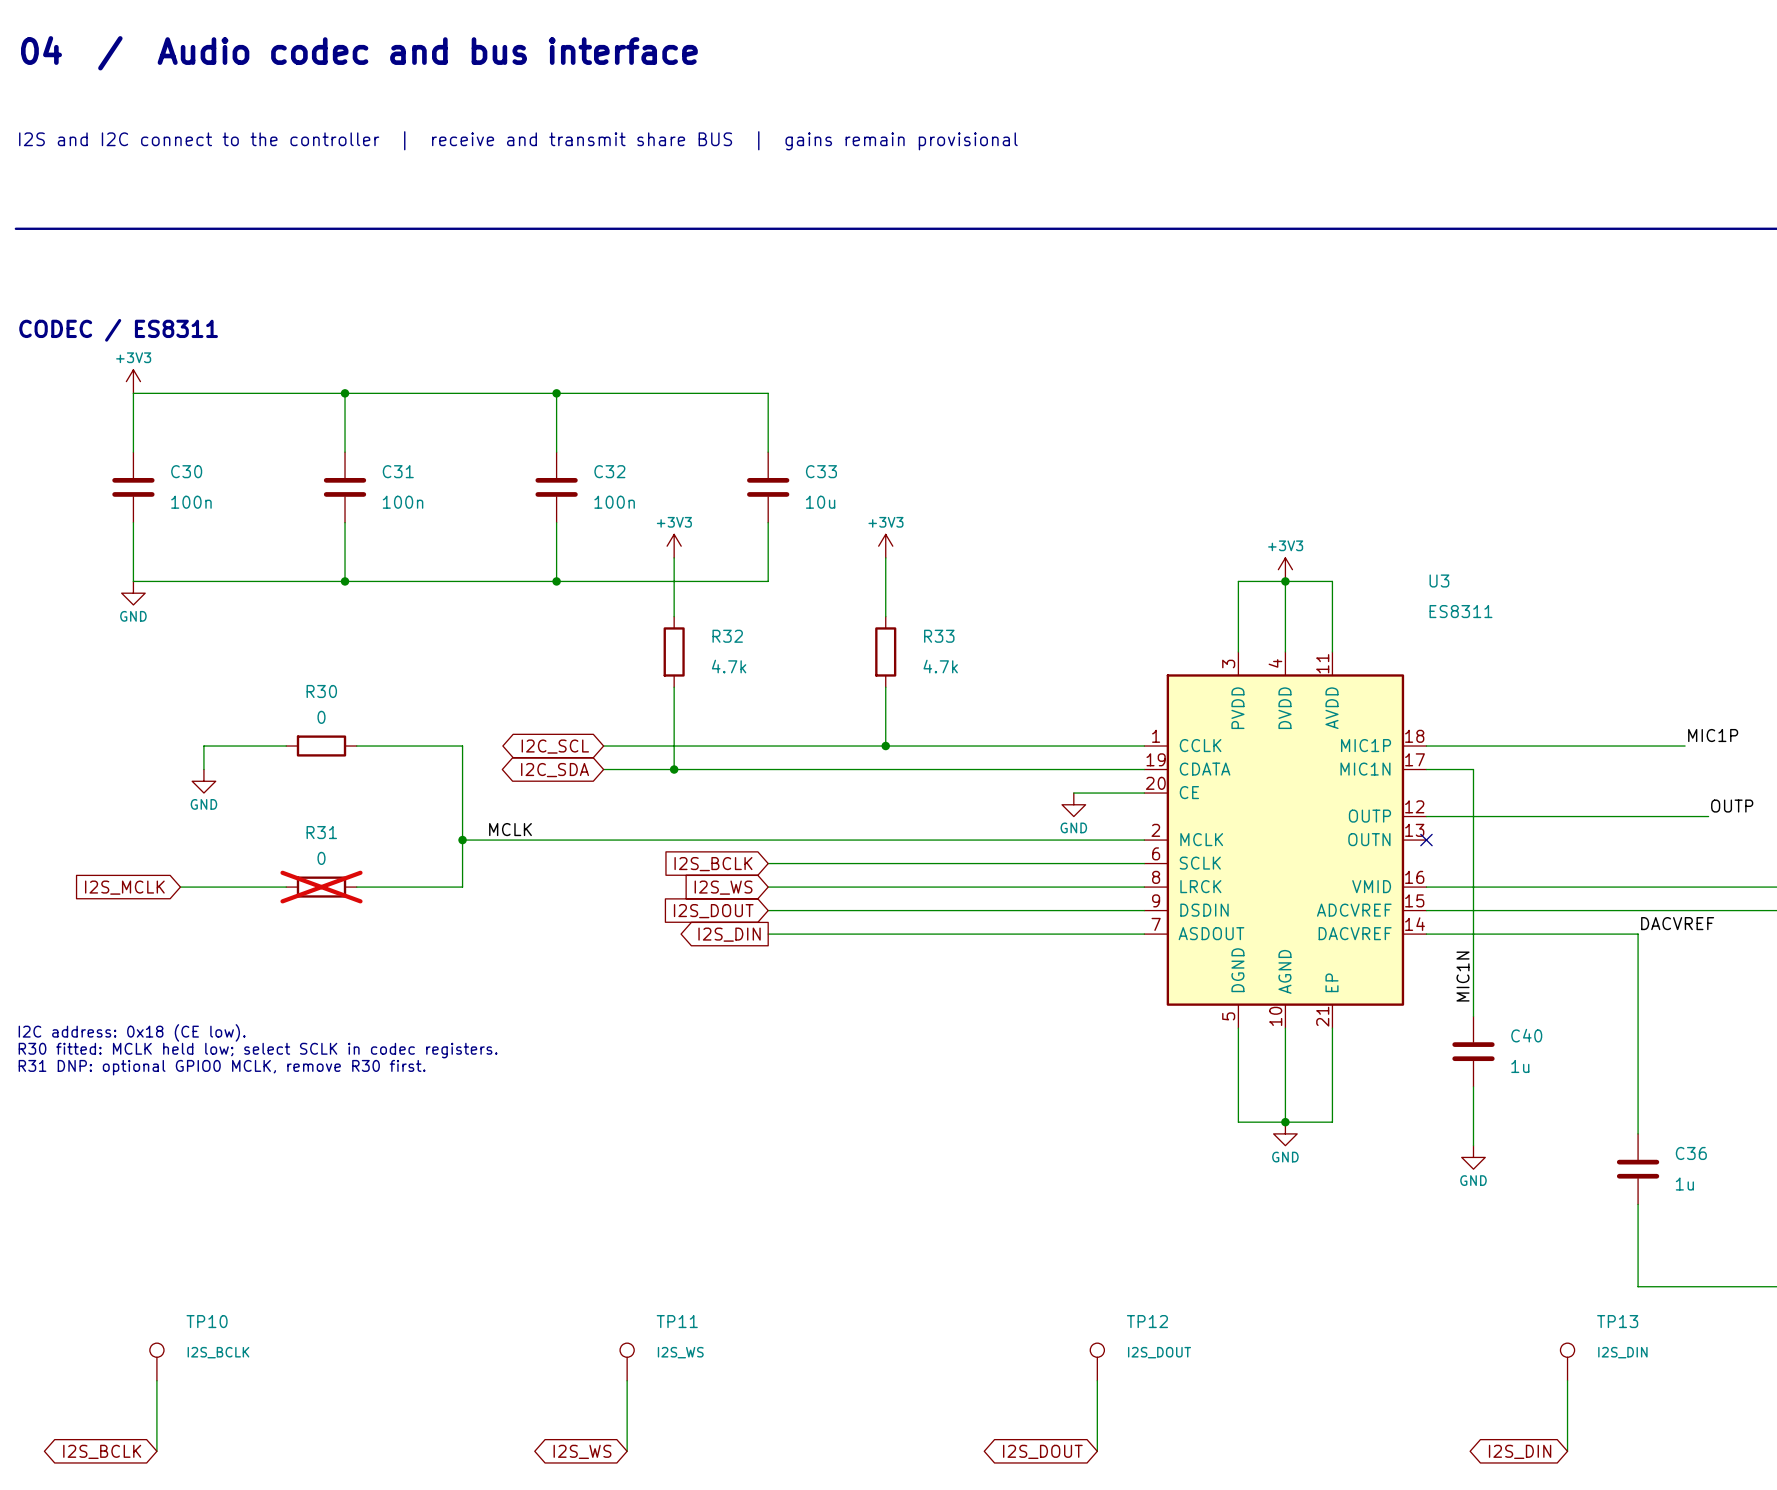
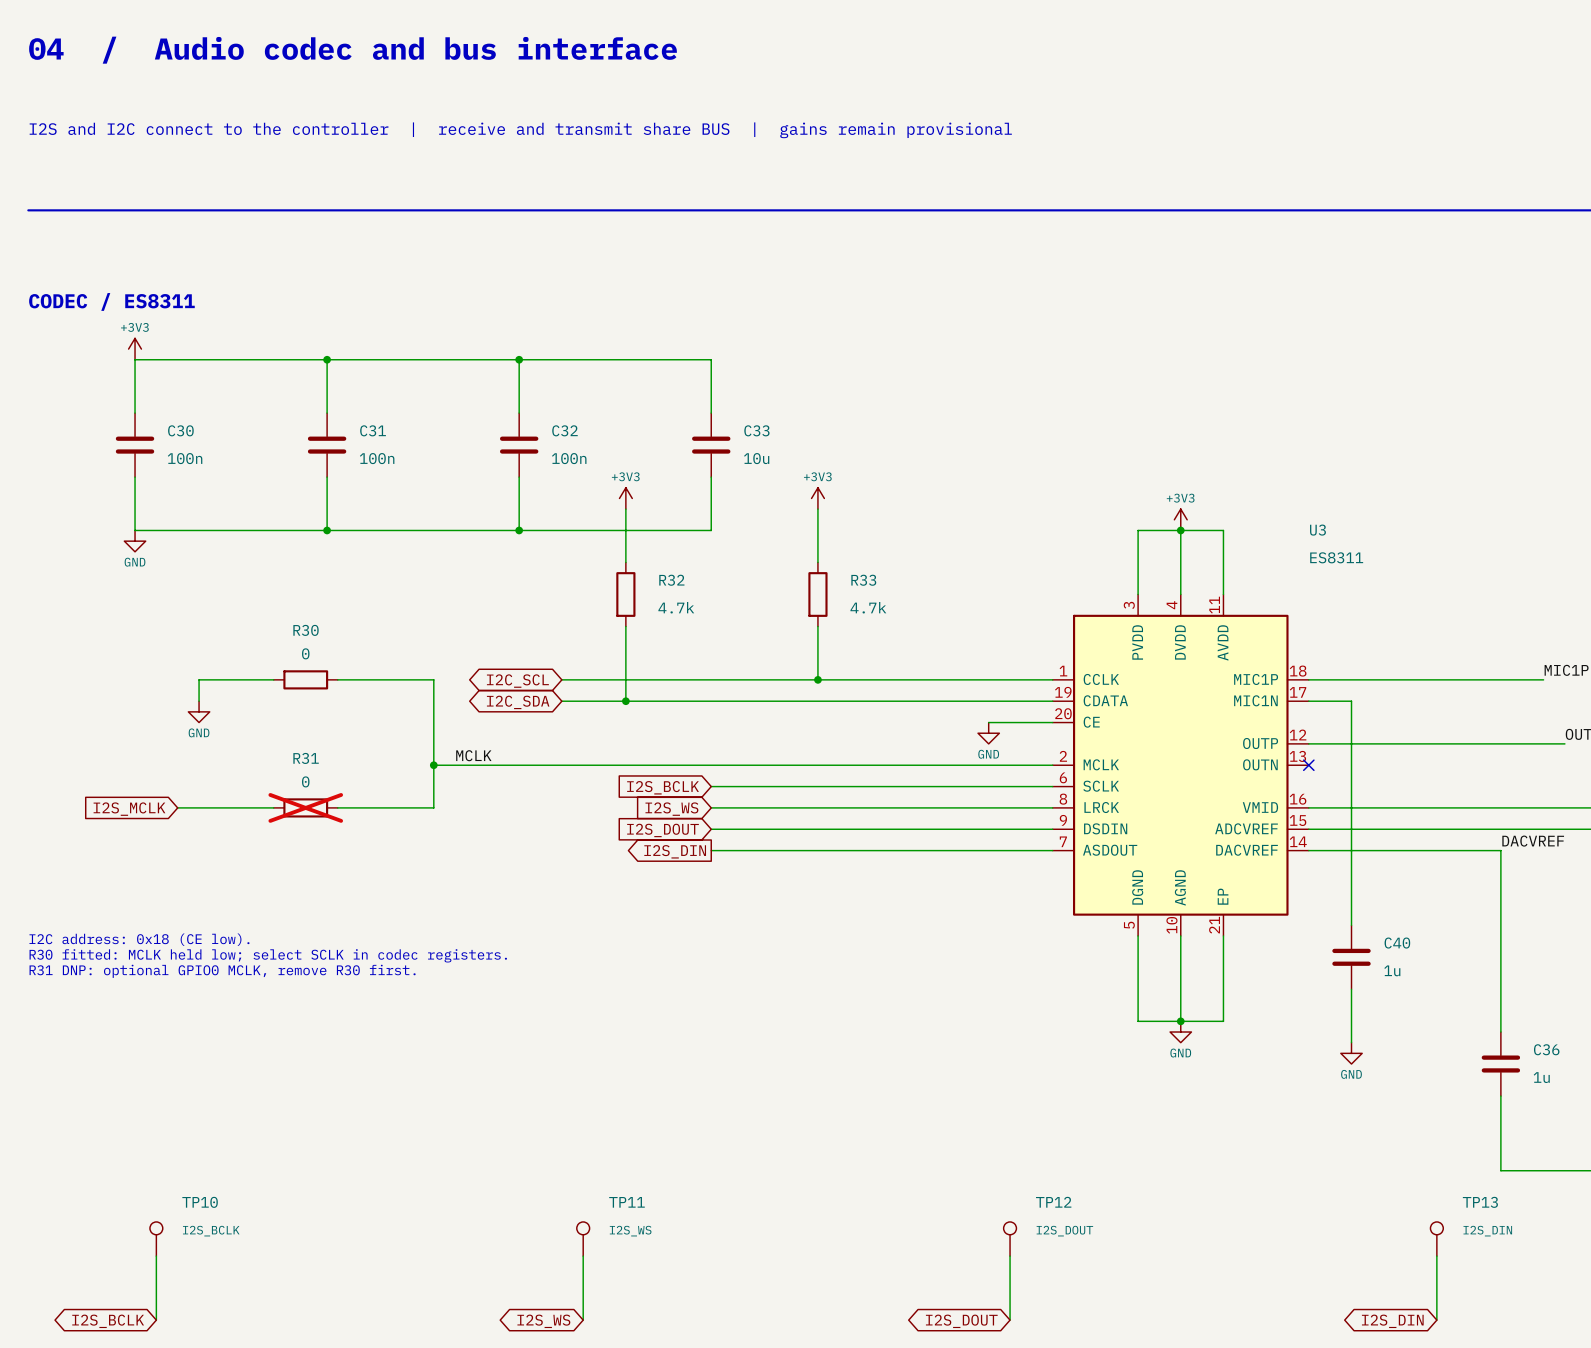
label: MIC1N (1463, 976) -> none

